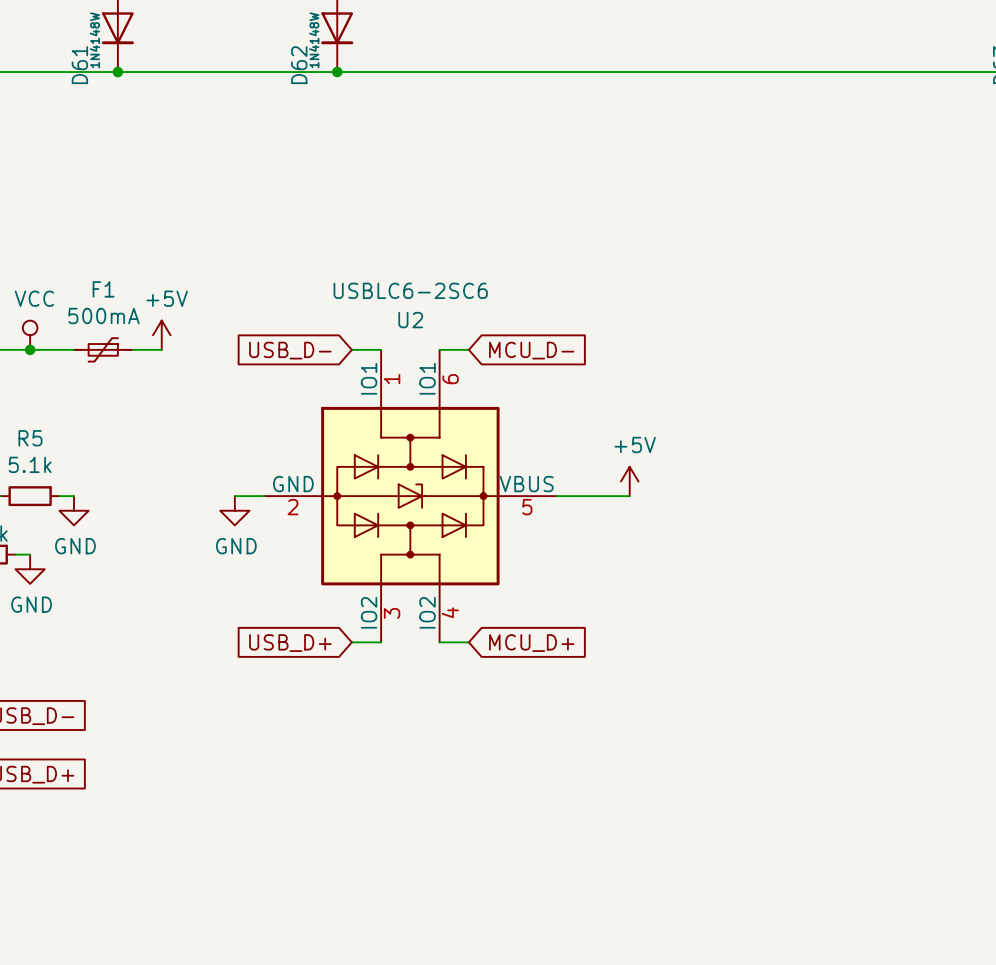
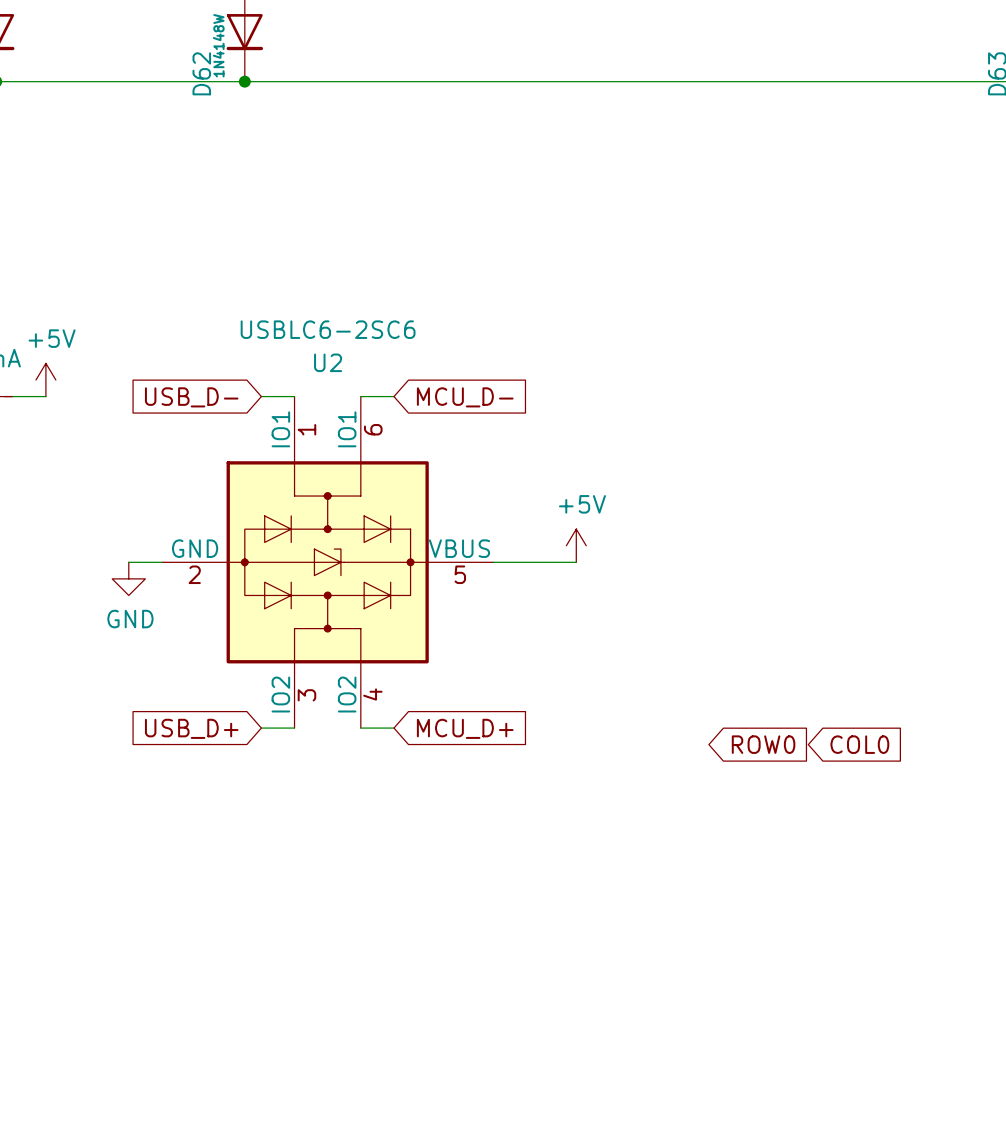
global label: none -> ROW0 (763, 744)
global label: none -> COL0 (859, 744)

